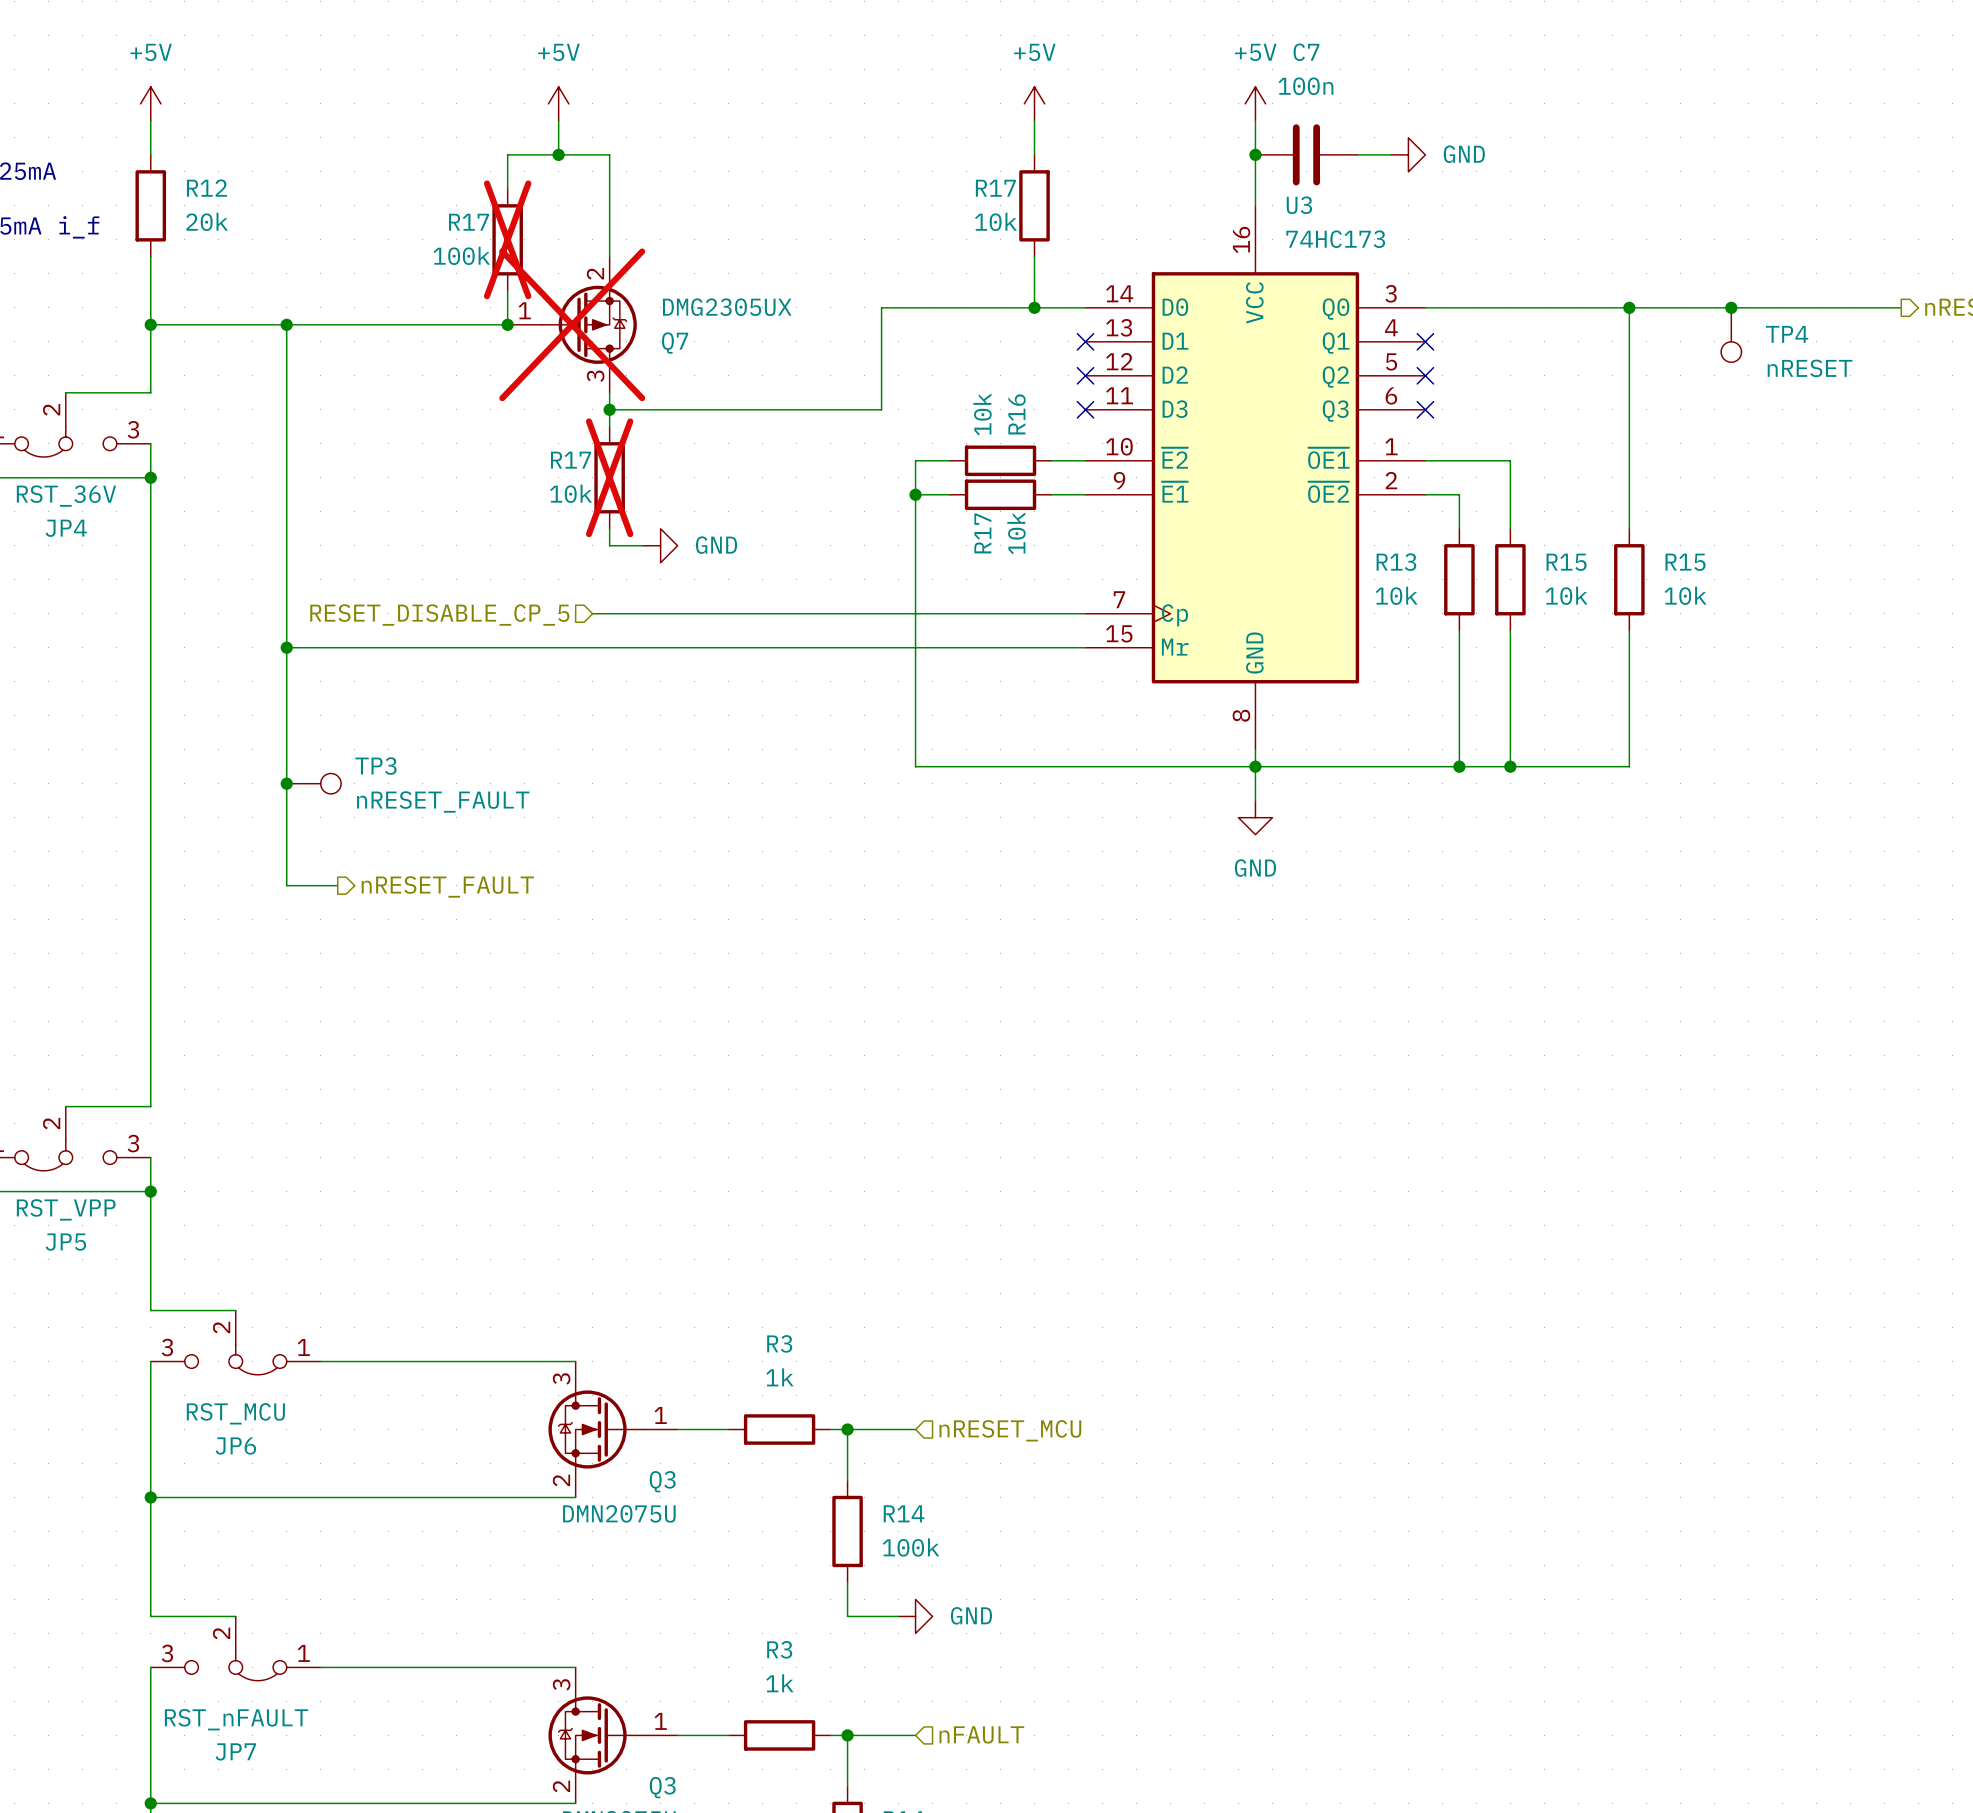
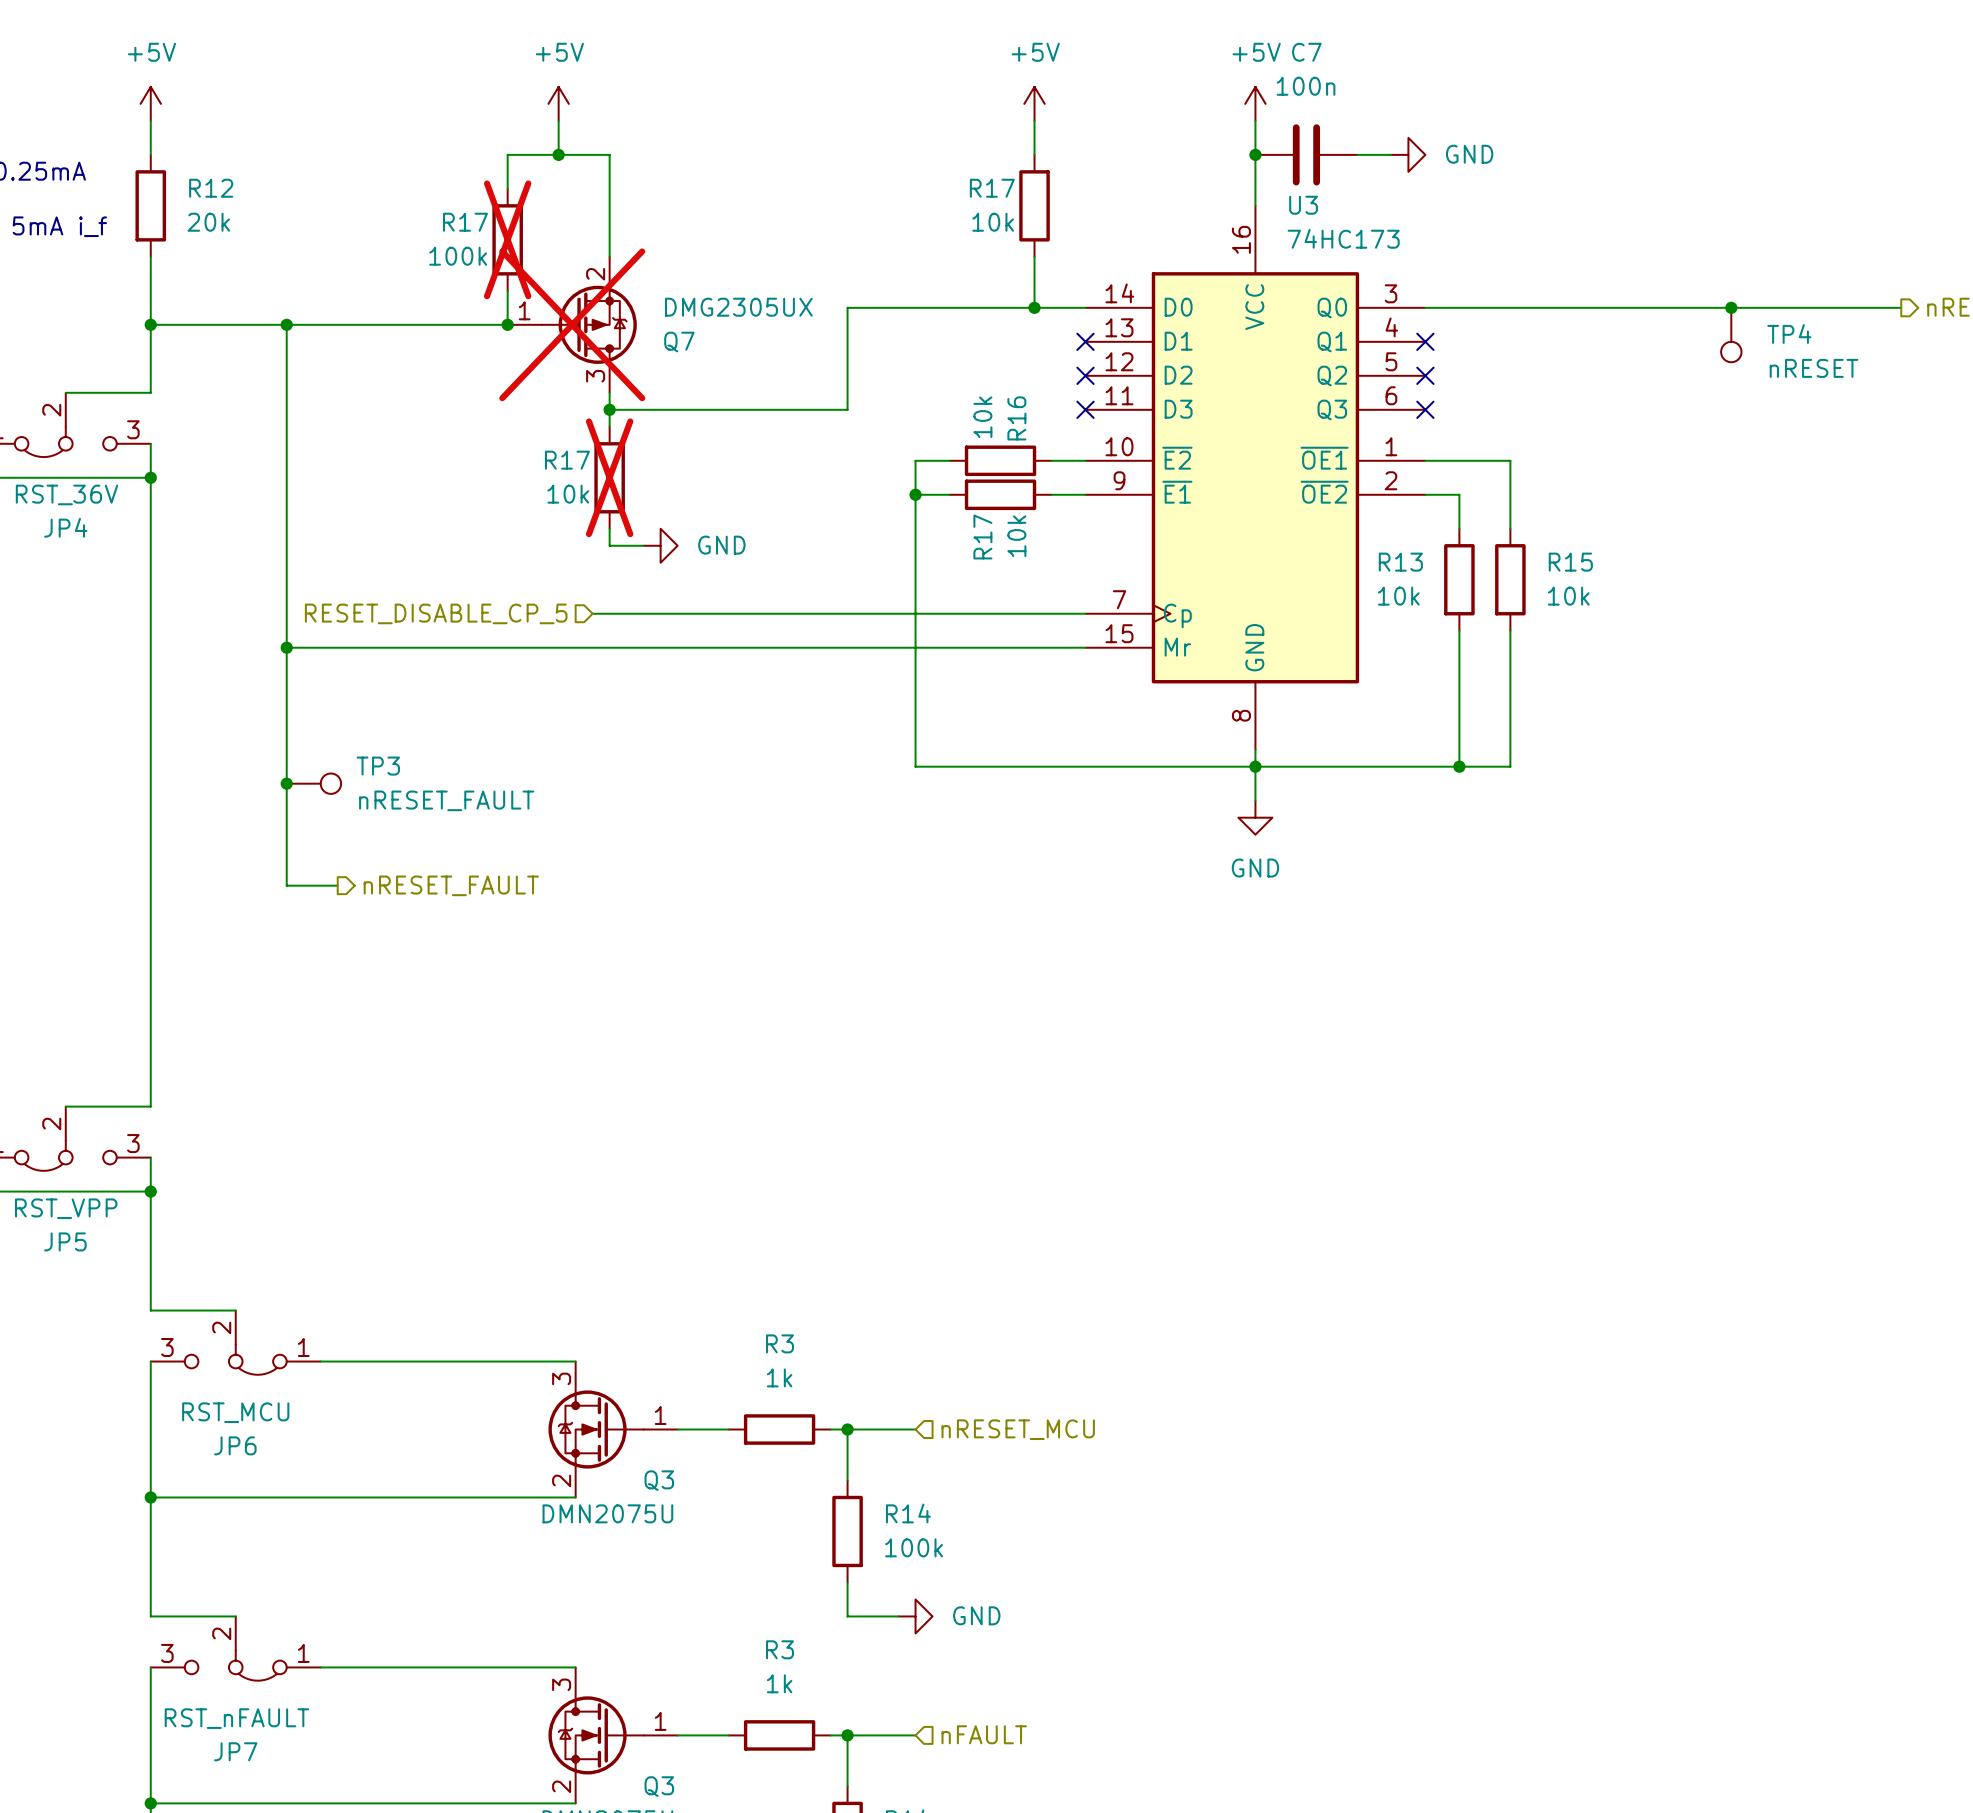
wire: (881, 307) (881, 409) (847, 409) -> (881, 307) (847, 307) (847, 409)
wire: (1629, 307) (1629, 528) -> none
junction: (1629, 307) -> none
R15: 10k (1629, 579) -> none
wire: (1629, 630) (1629, 766) (1510, 766) -> none
junction: (1510, 766) -> none

